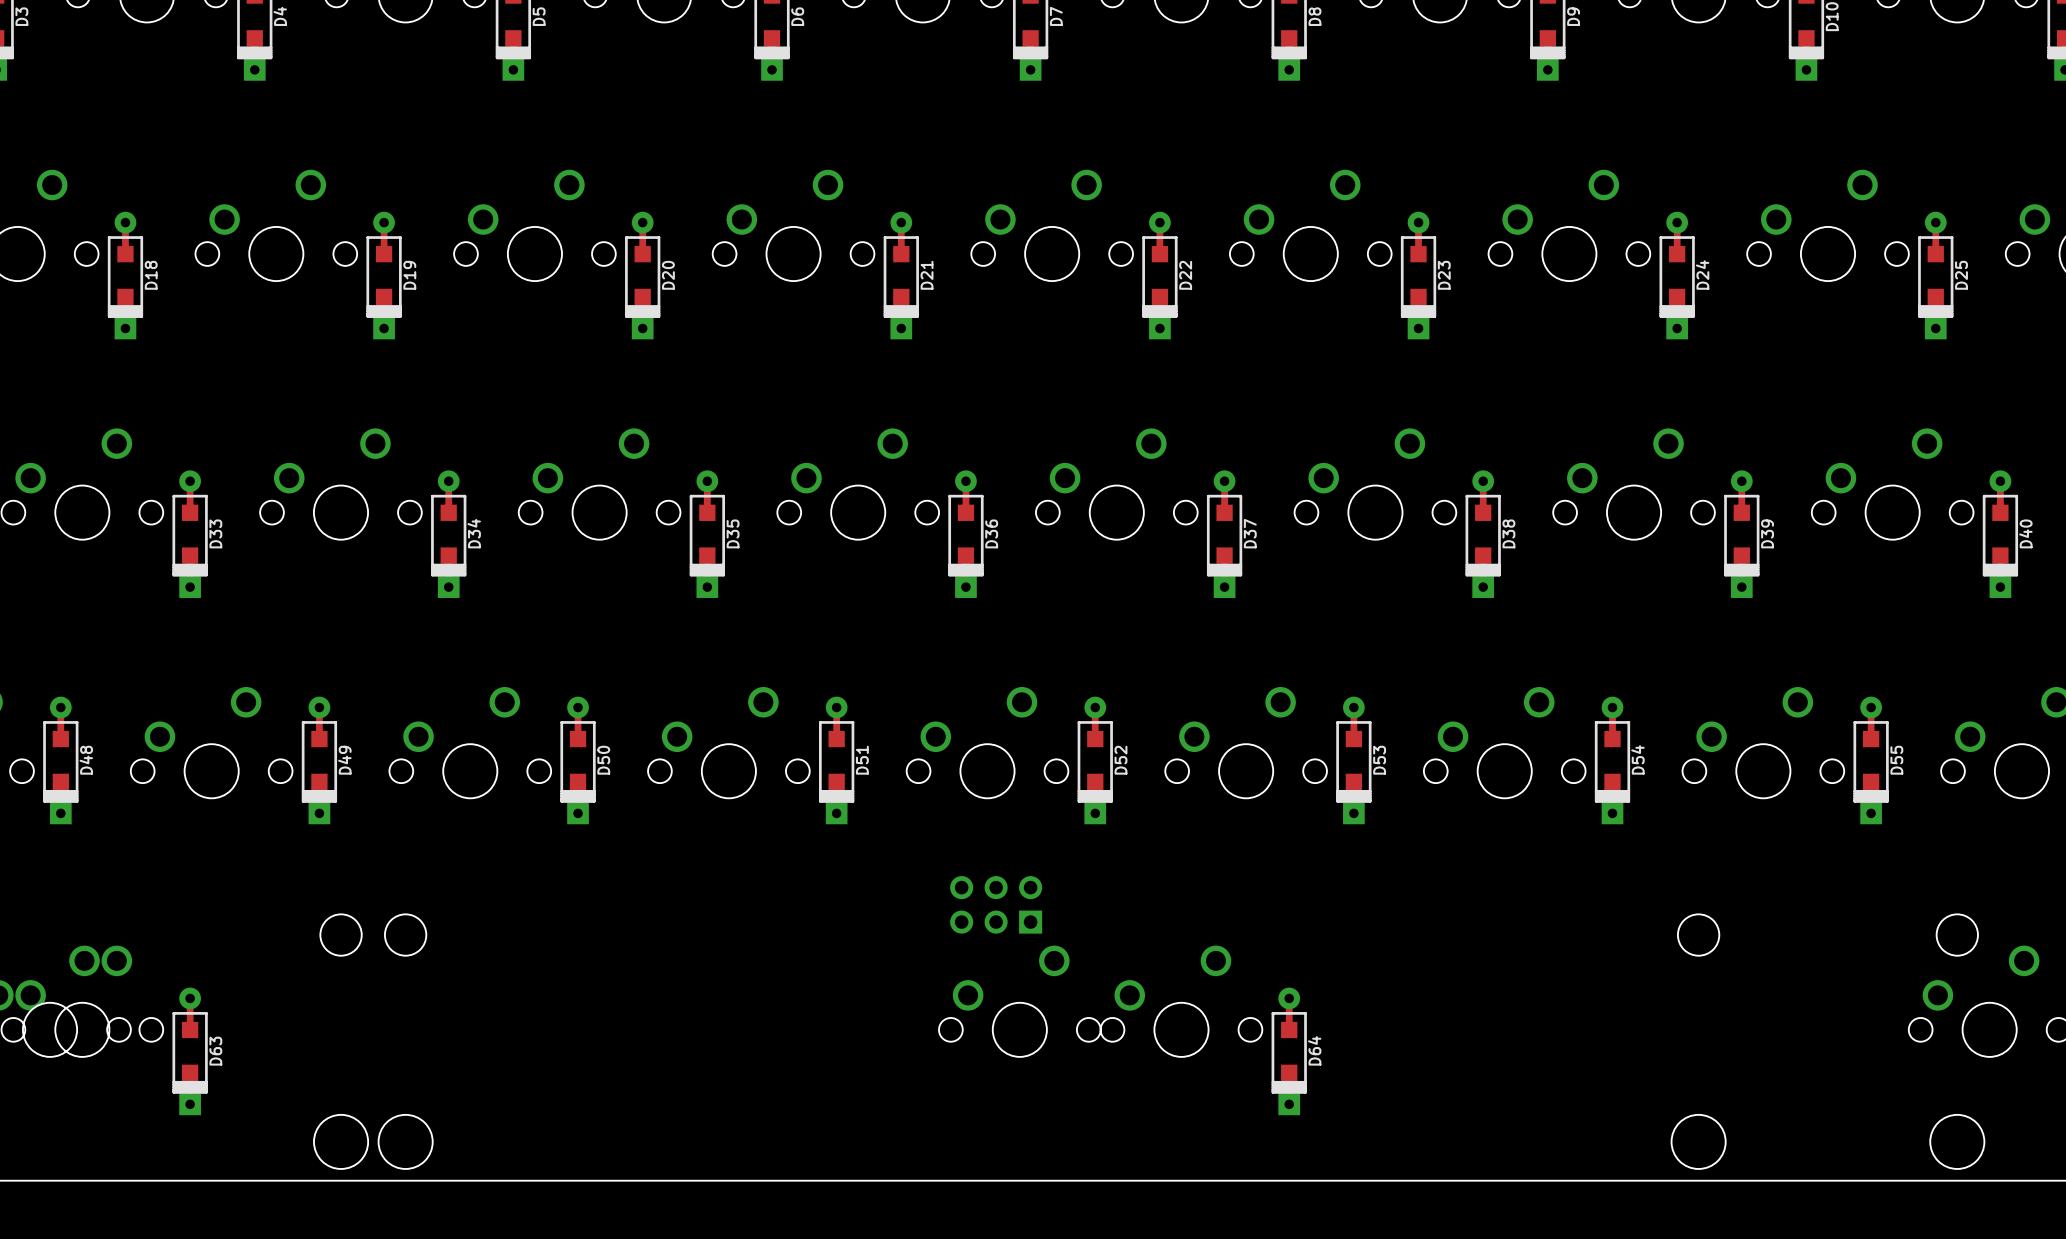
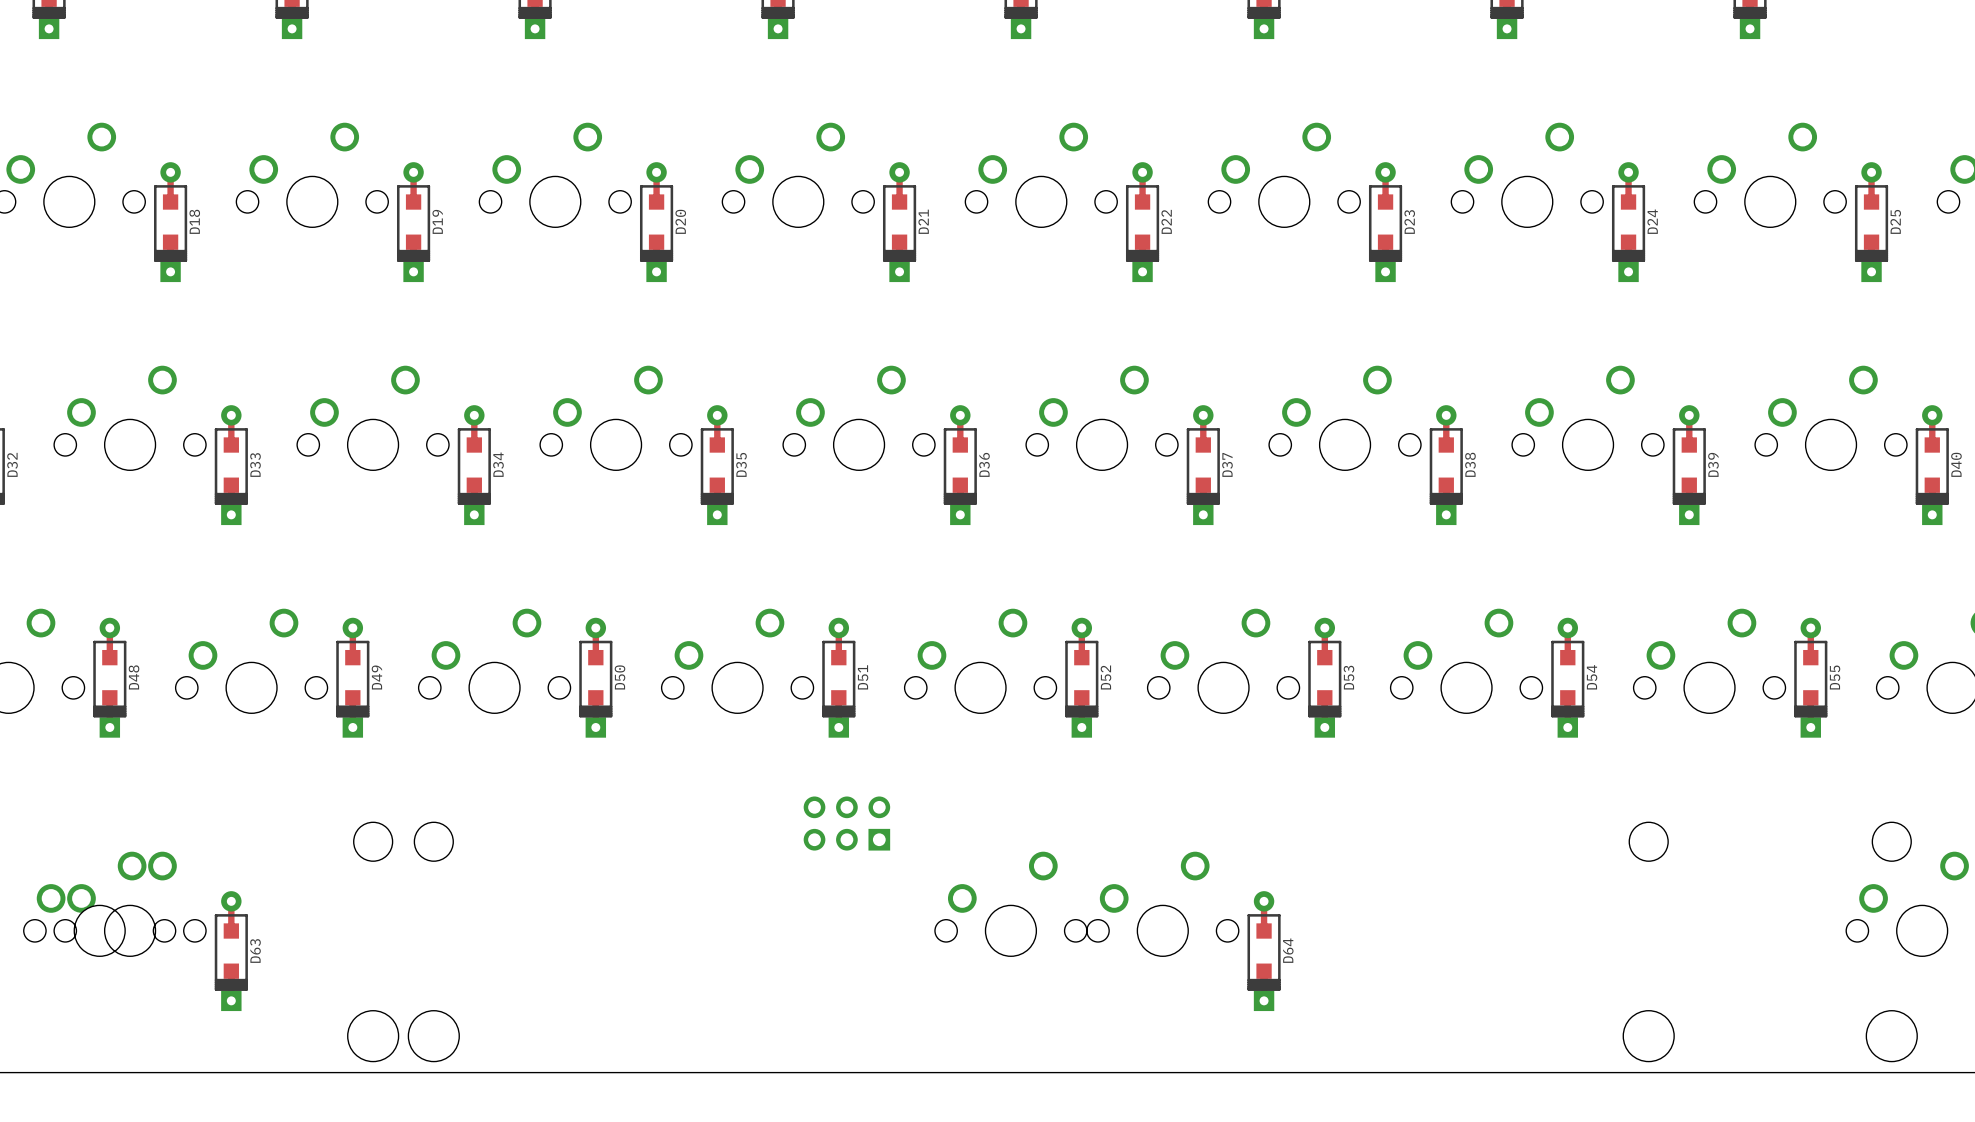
part position: (996, 904) -> (846, 823)

